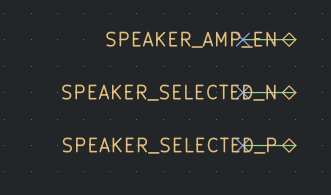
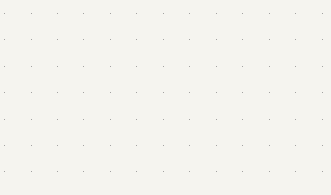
hierarchical label: SPEAKER_AMP_EN (190, 39) -> none
wire: (242, 39) (295, 39) -> none
no-connect mark: (242, 39) -> none
hierarchical label: SPEAKER_SELECTED_N (168, 92) -> none
wire: (242, 92) (295, 92) -> none
no-connect mark: (242, 92) -> none
hierarchical label: SPEAKER_SELECTED_P (169, 145) -> none
wire: (242, 145) (295, 145) -> none
no-connect mark: (242, 145) -> none

